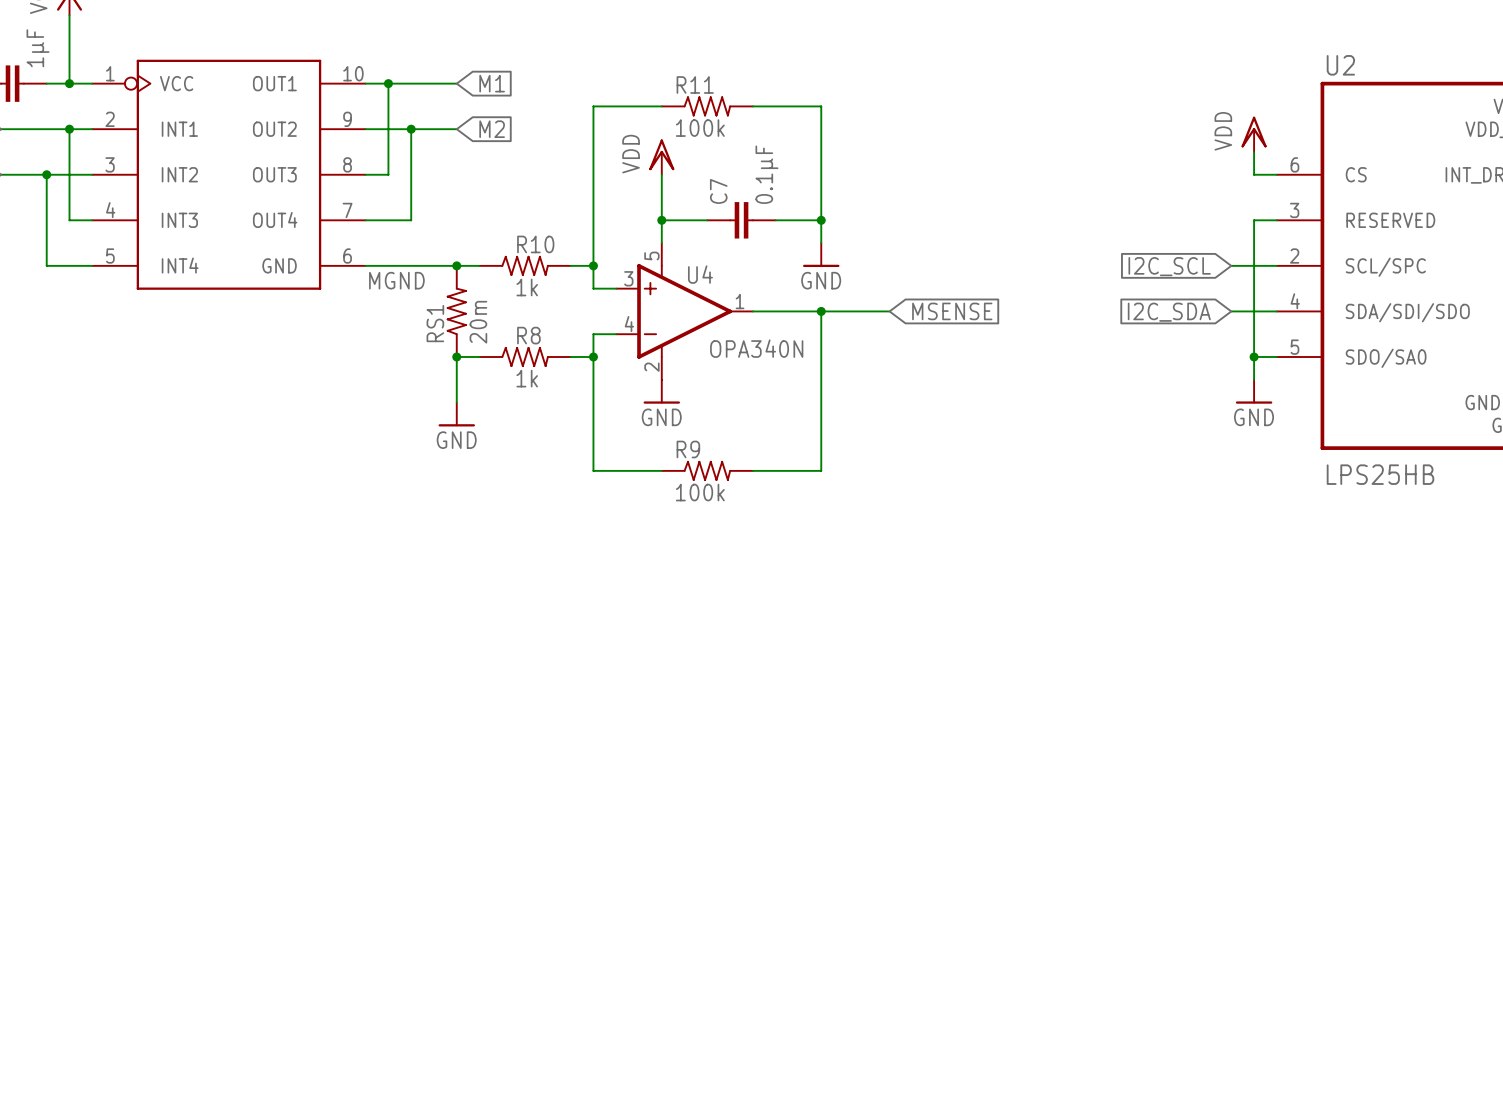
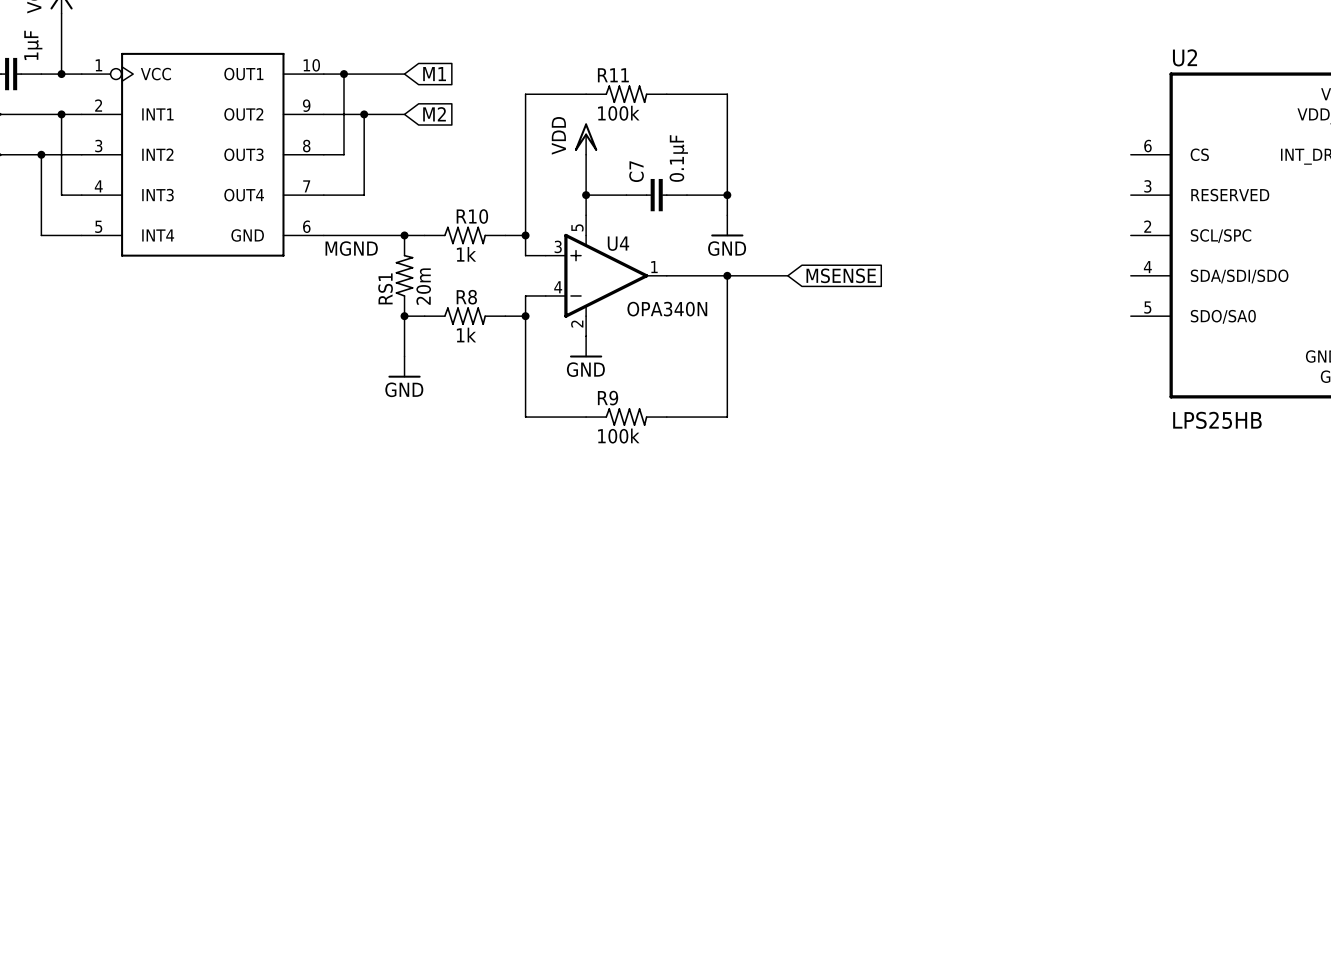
power symbol: VDD (1254, 134) -> none
wire: (1254, 151) (1254, 174) (1276, 174) -> none
wire: (1276, 220) (1254, 220) (1254, 379) -> none
wire: (1231, 265) (1276, 265) -> none
global label: I2C_SCL (1169, 266) -> none
wire: (1231, 311) (1276, 311) -> none
global label: I2C_SDA (1169, 312) -> none
wire: (1254, 356) (1276, 356) -> none
junction: (1254, 356) -> none
power symbol: GND (1254, 391) -> none

